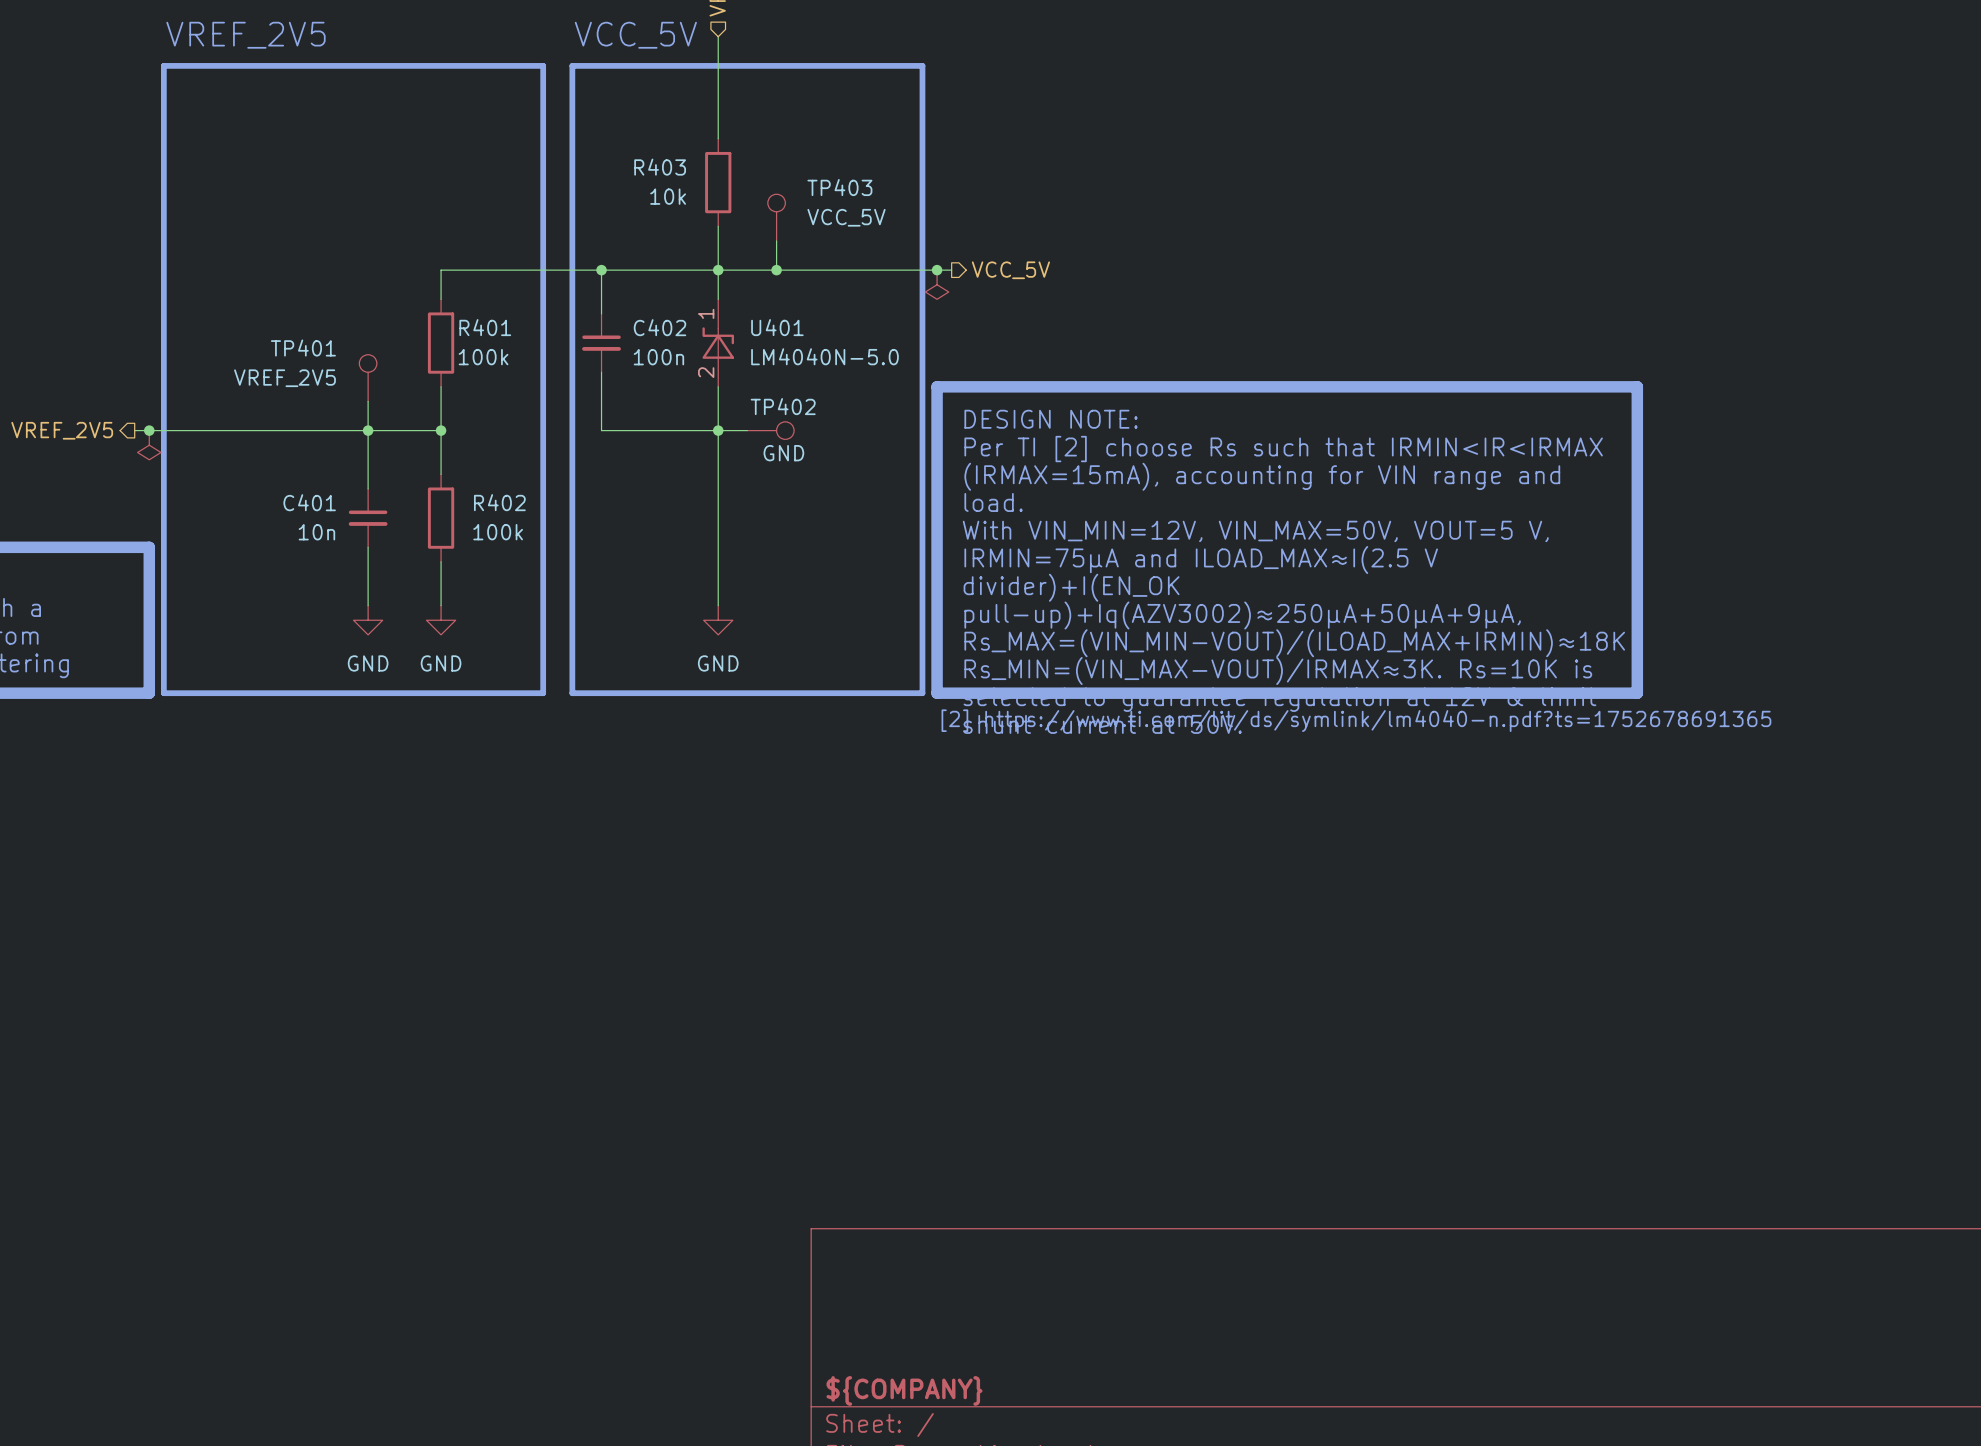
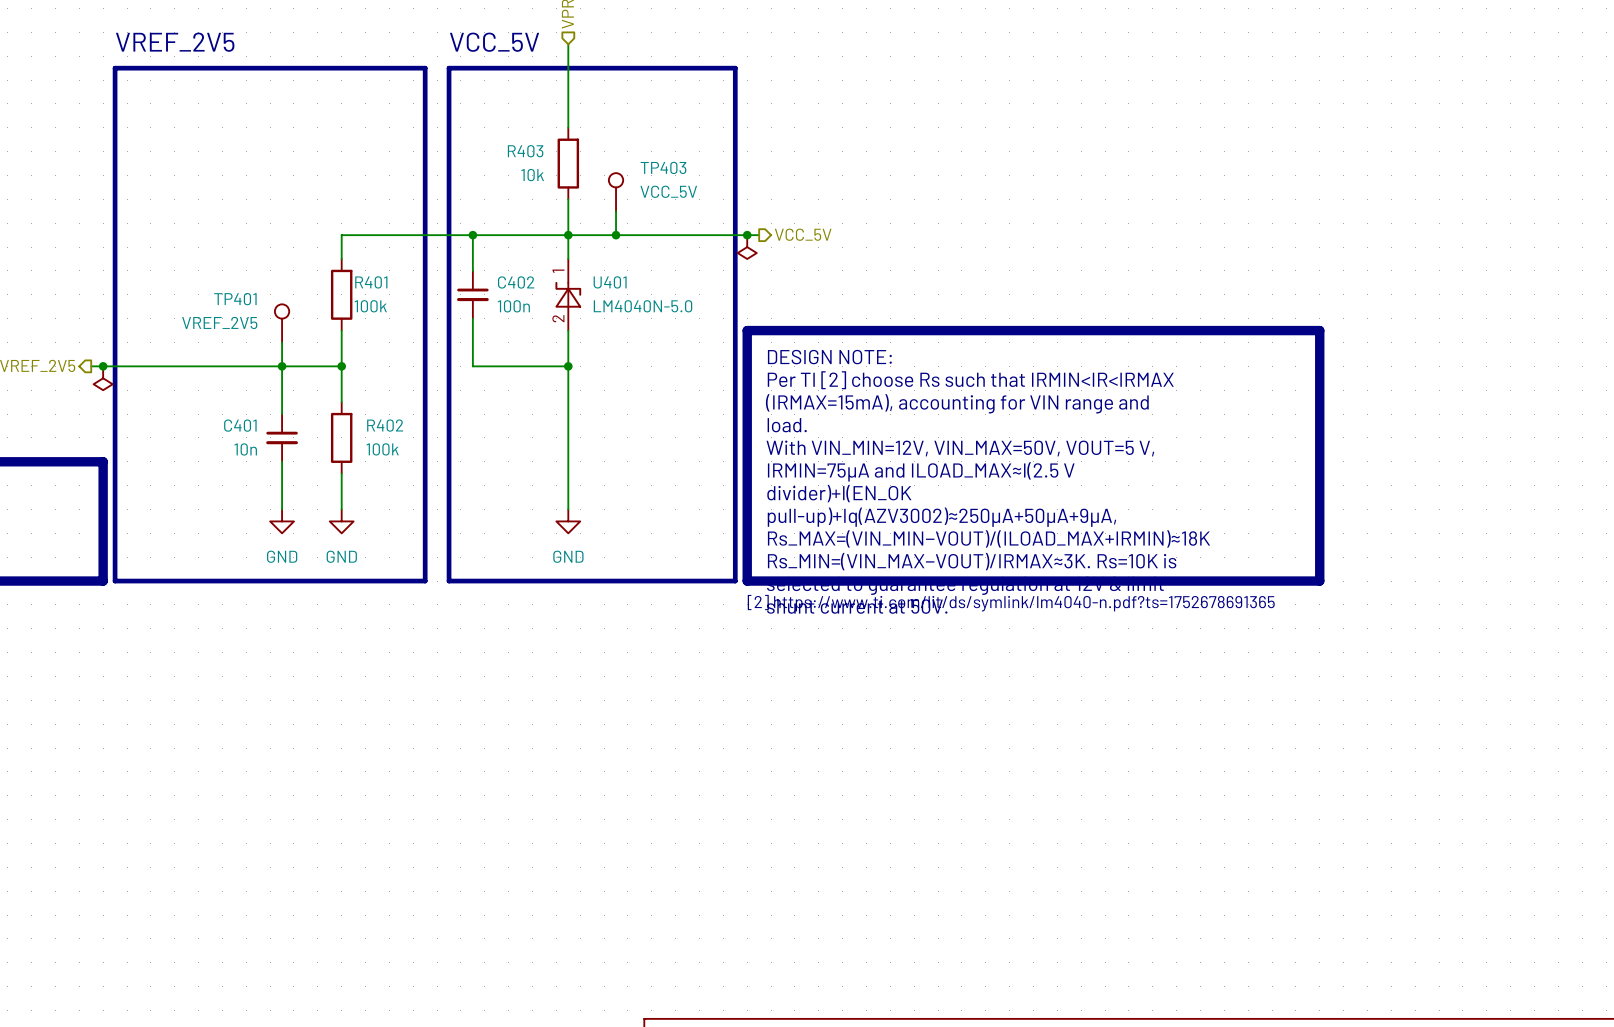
wire: (718, 430) (747, 430) -> none
TP402: GND (770, 430) -> none

